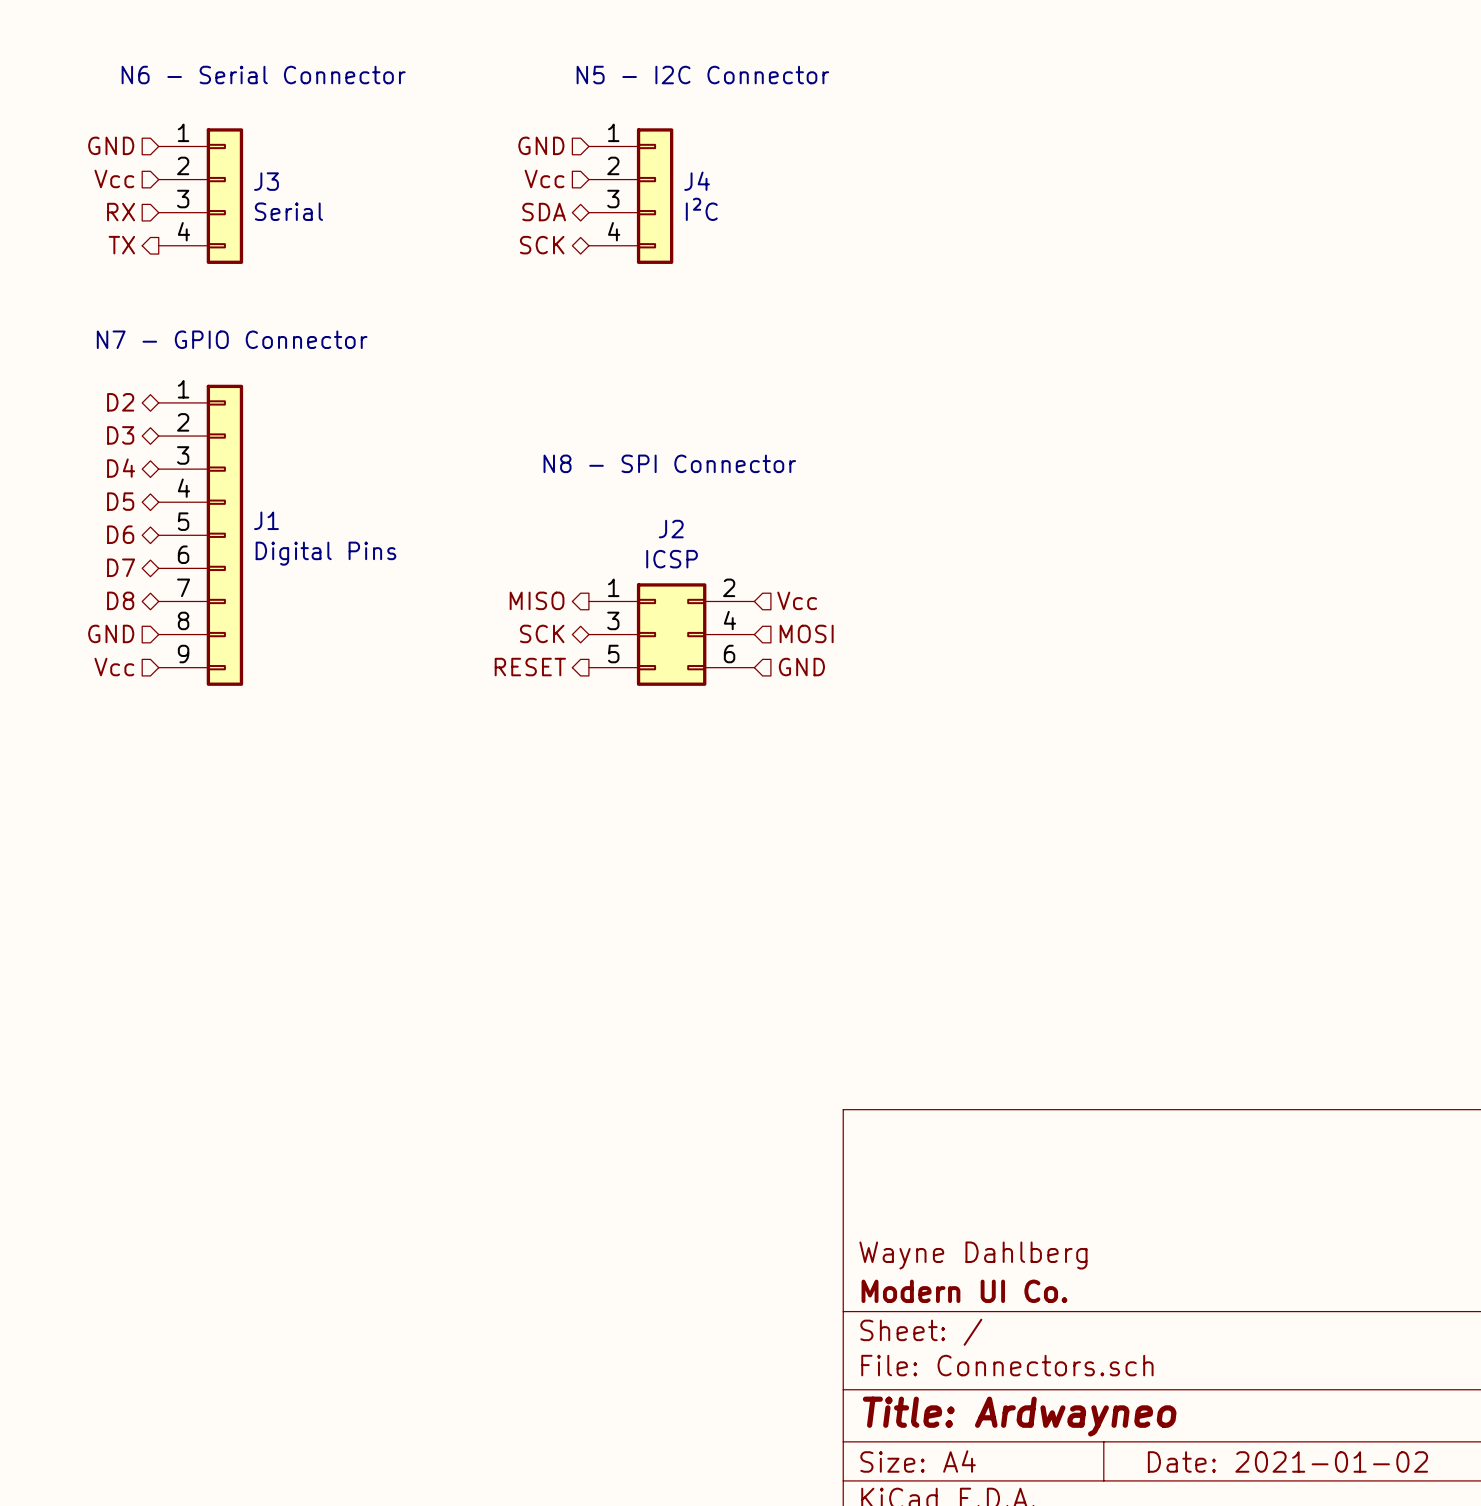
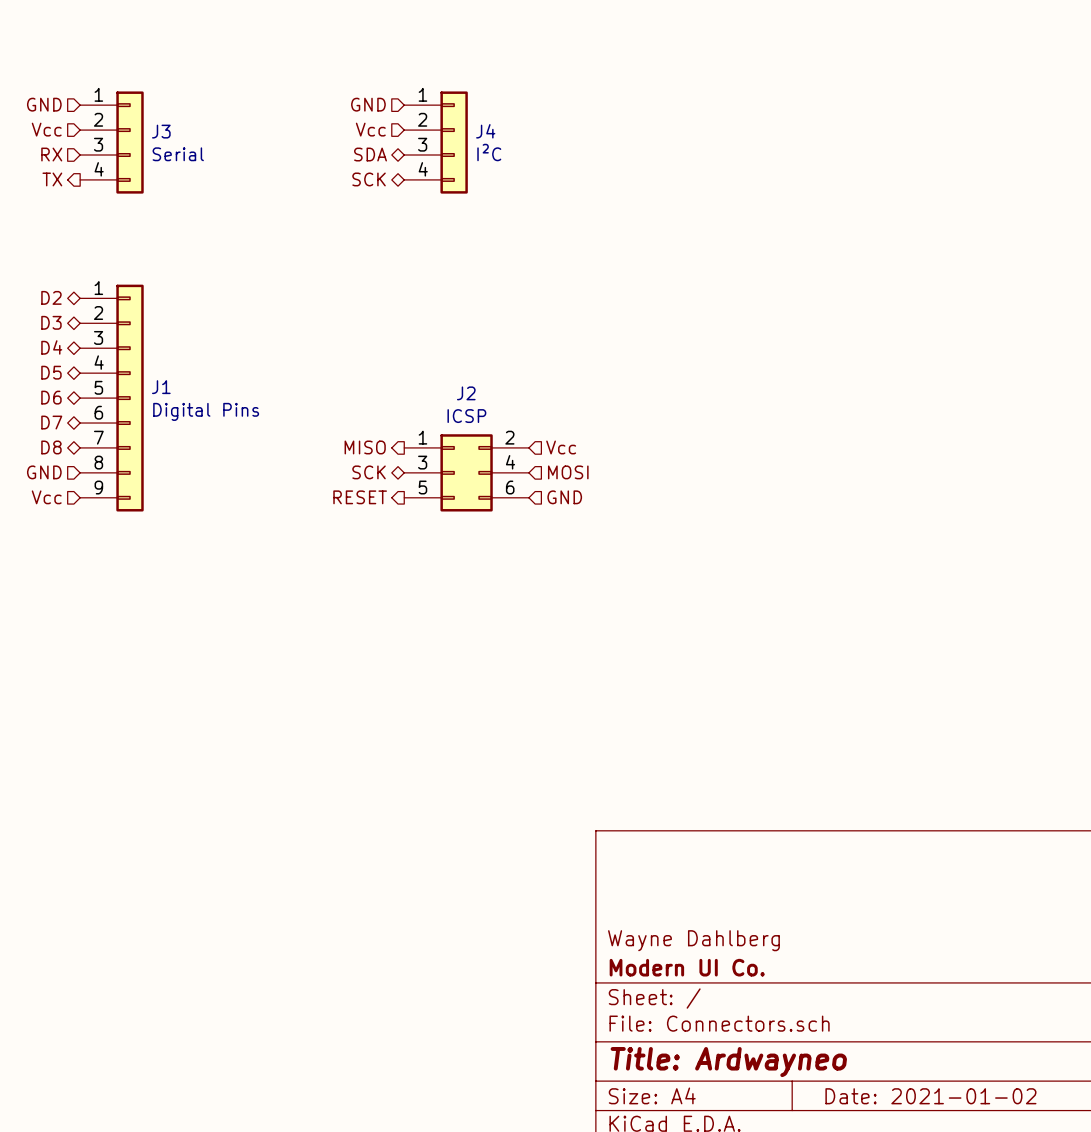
text: N6 - Serial Connector (263, 75) -> none
text: N5 - I2C Connector (702, 75) -> none
text: N7 - GPIO Connector (232, 339) -> none
text: N8 - SPI Connector (669, 463) -> none

